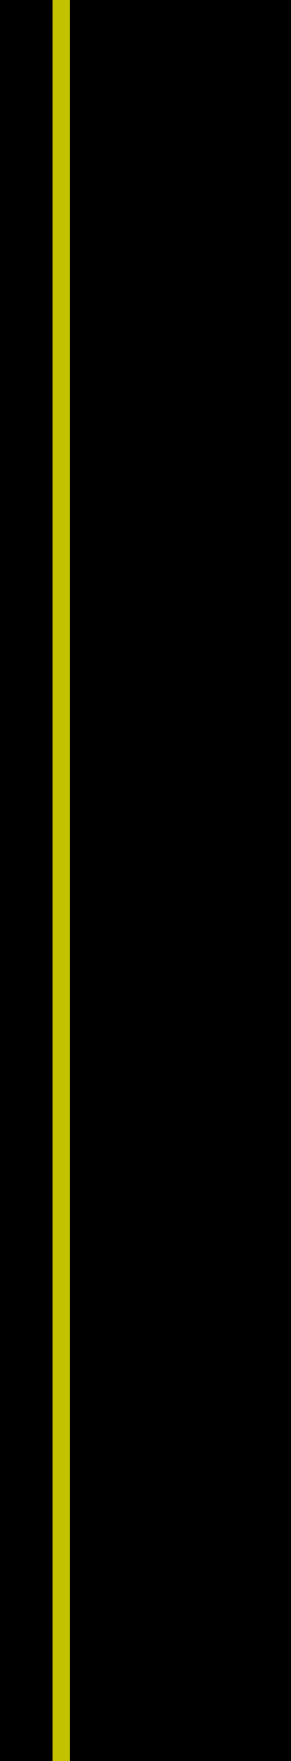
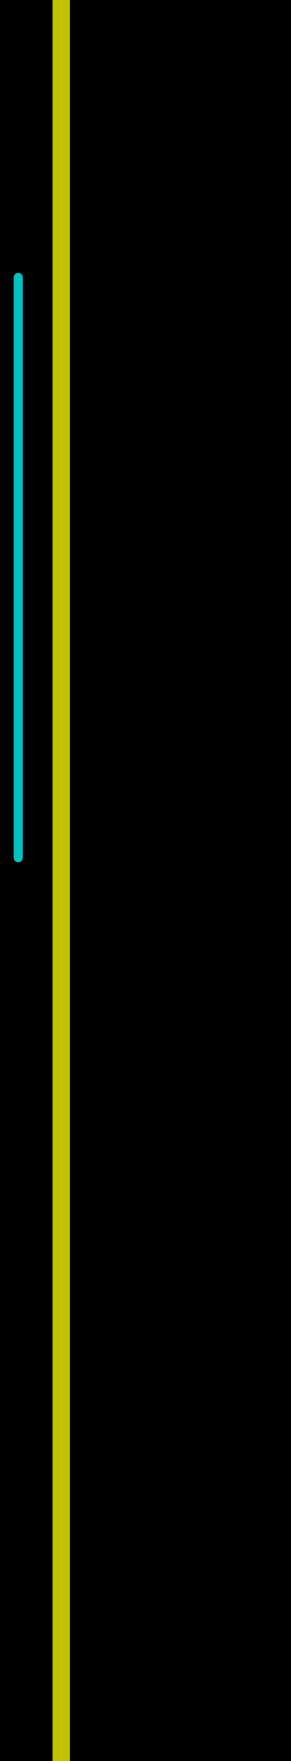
line: none -> (18, 277) (18, 857)

